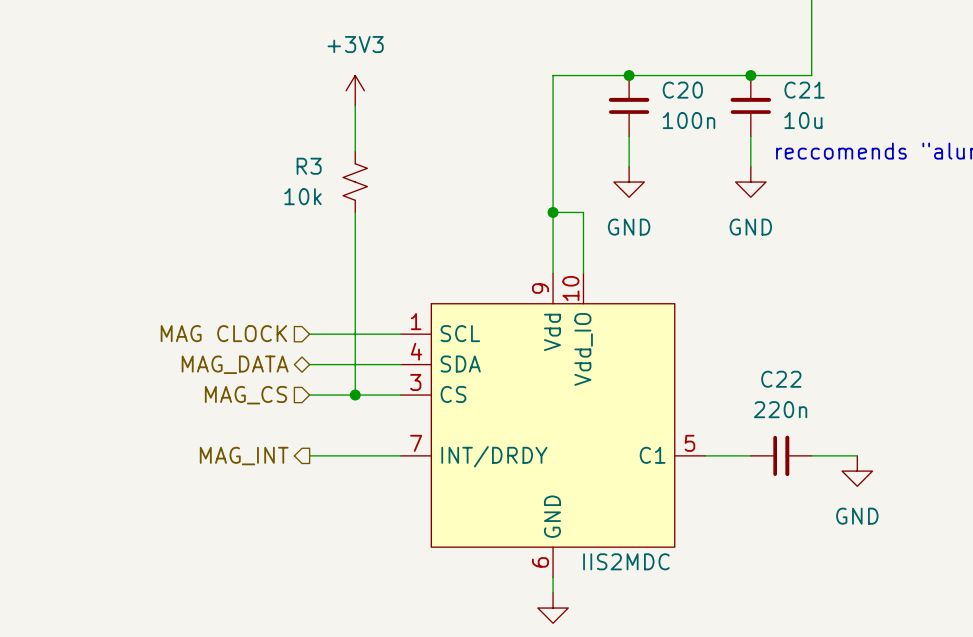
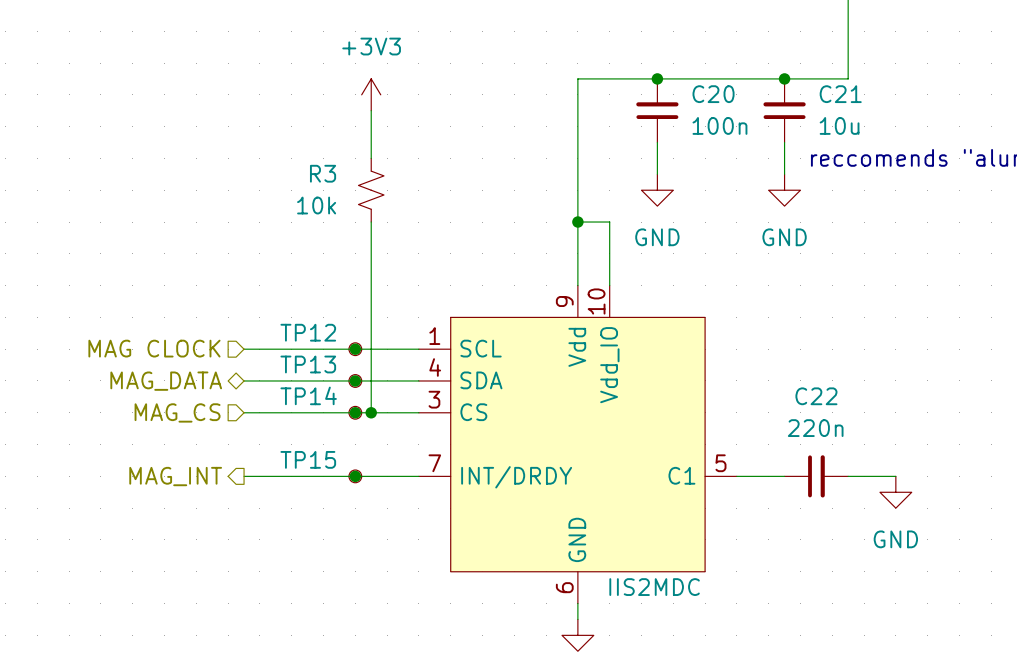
hierarchical label position: MAG CLOCK (223, 333) -> MAG CLOCK (154, 348)
wire: none -> (244, 349) (323, 349)
junction: none -> (355, 349)
TP12: none -> (355, 349)
wire: none -> (244, 380) (323, 380)
hierarchical label position: MAG_DATA (235, 364) -> MAG_DATA (166, 381)
junction: none -> (355, 380)
TP13: none -> (355, 380)
wire: none -> (244, 412) (323, 412)
hierarchical label position: MAG_CS (245, 395) -> MAG_CS (177, 412)
junction: none -> (355, 412)
TP14: none -> (355, 412)
wire: none -> (244, 476) (323, 476)
junction: none -> (355, 476)
TP15: none -> (355, 476)
hierarchical label position: MAG_INT (244, 456) -> MAG_INT (175, 476)

